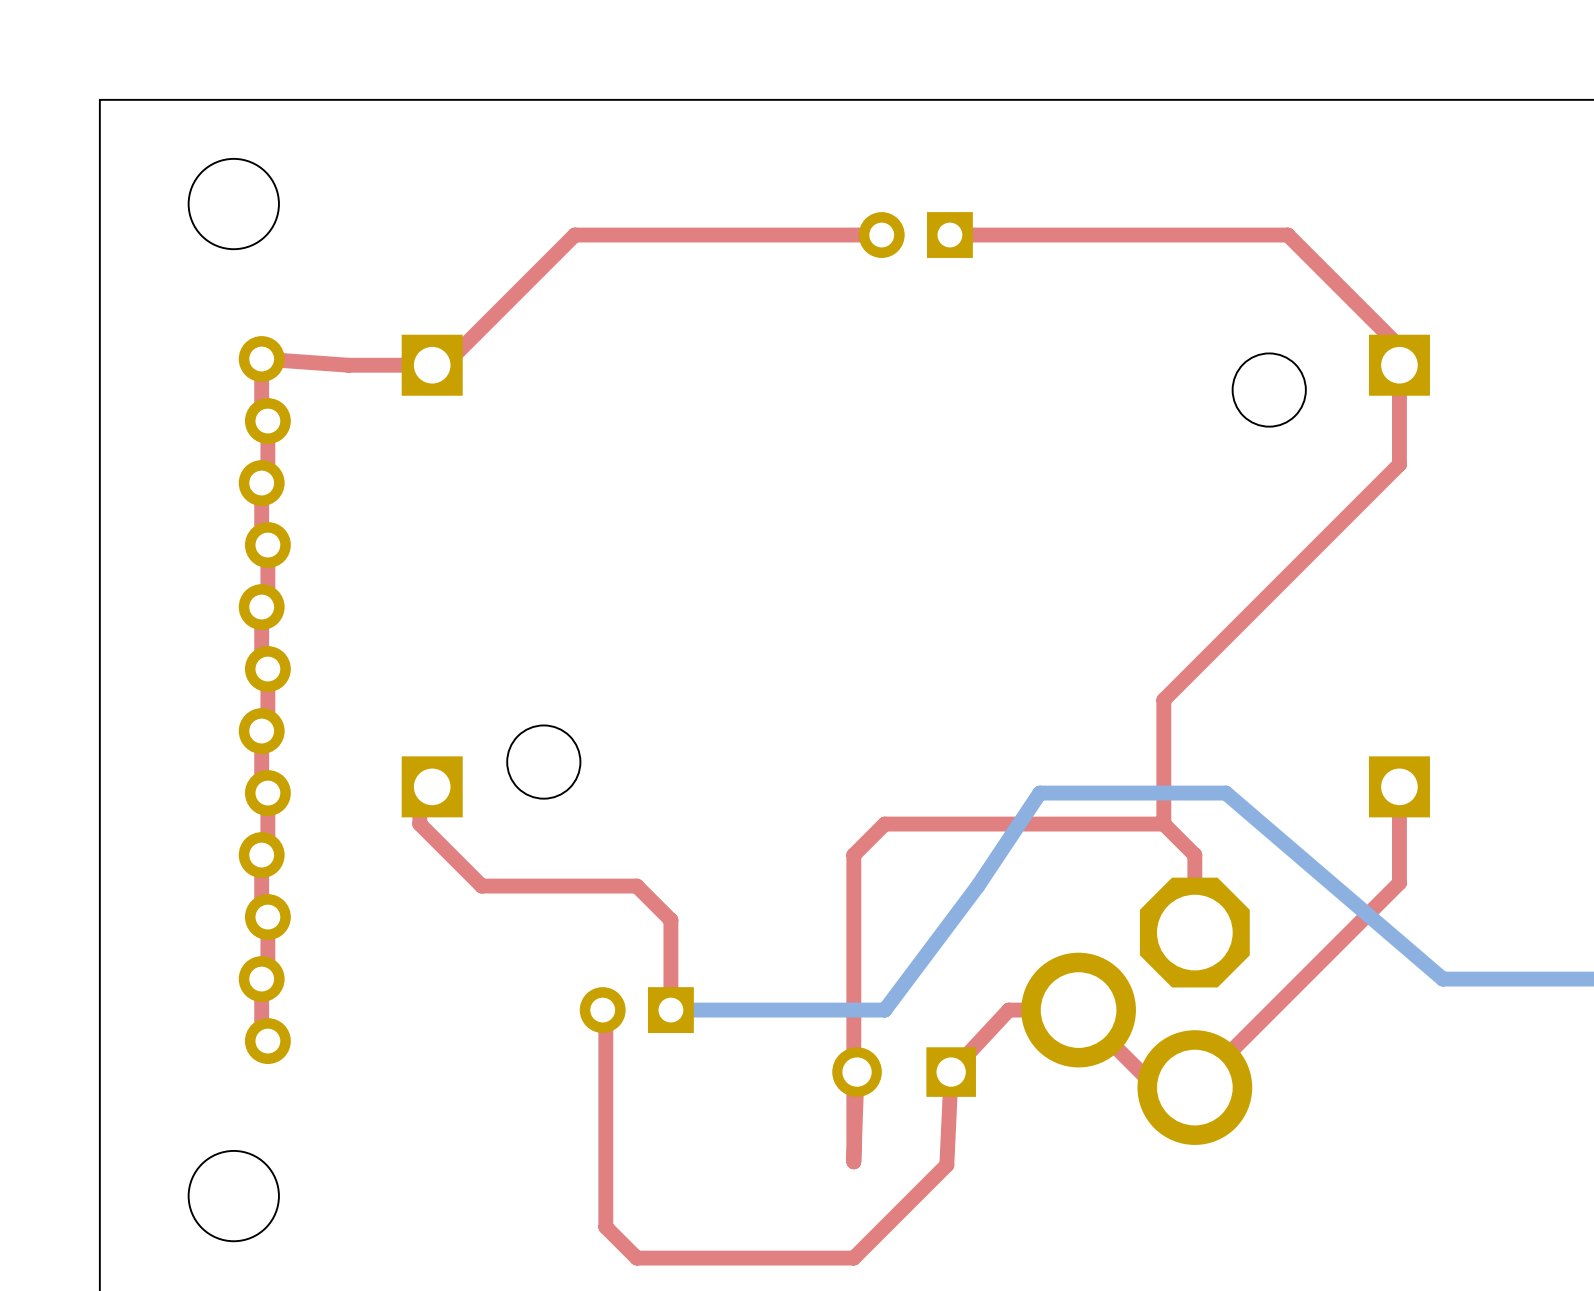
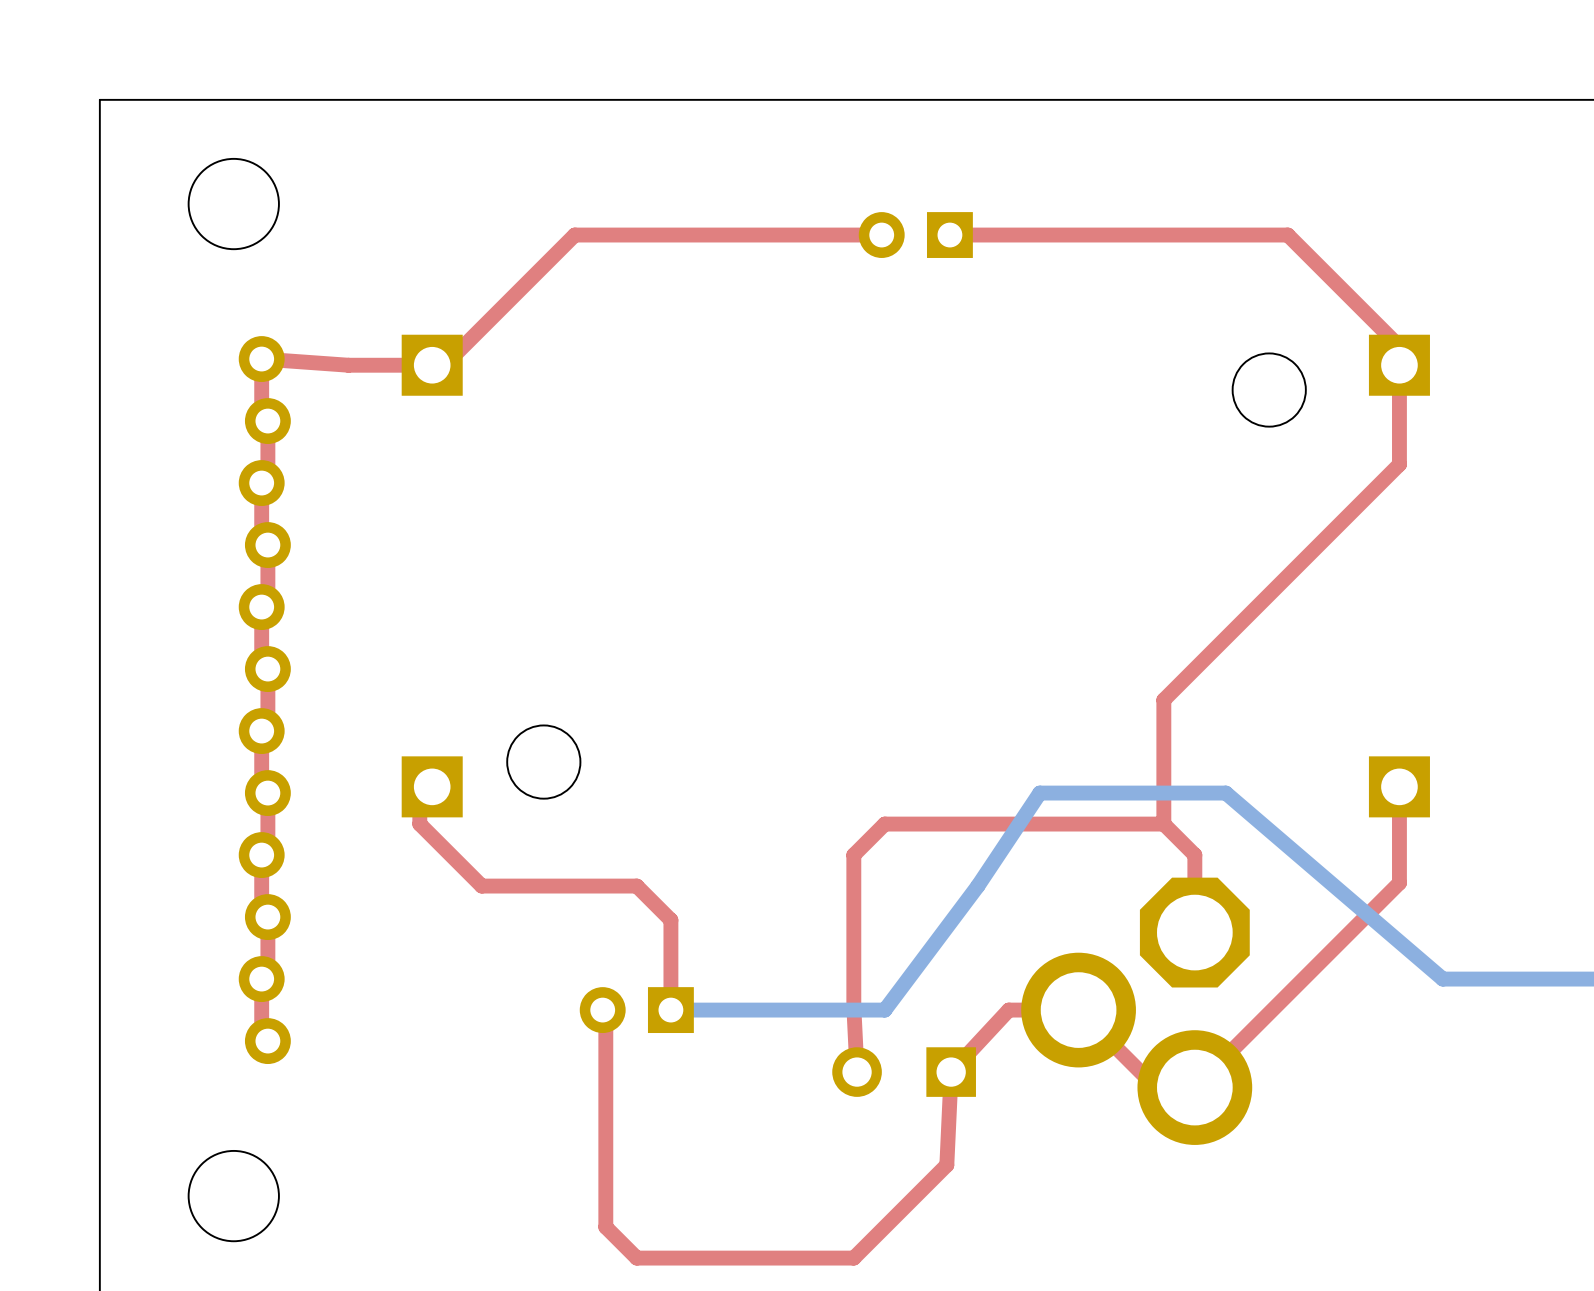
top track: (853, 1006) (853, 1161) (857, 1072) -> (853, 1006) (857, 1072)

